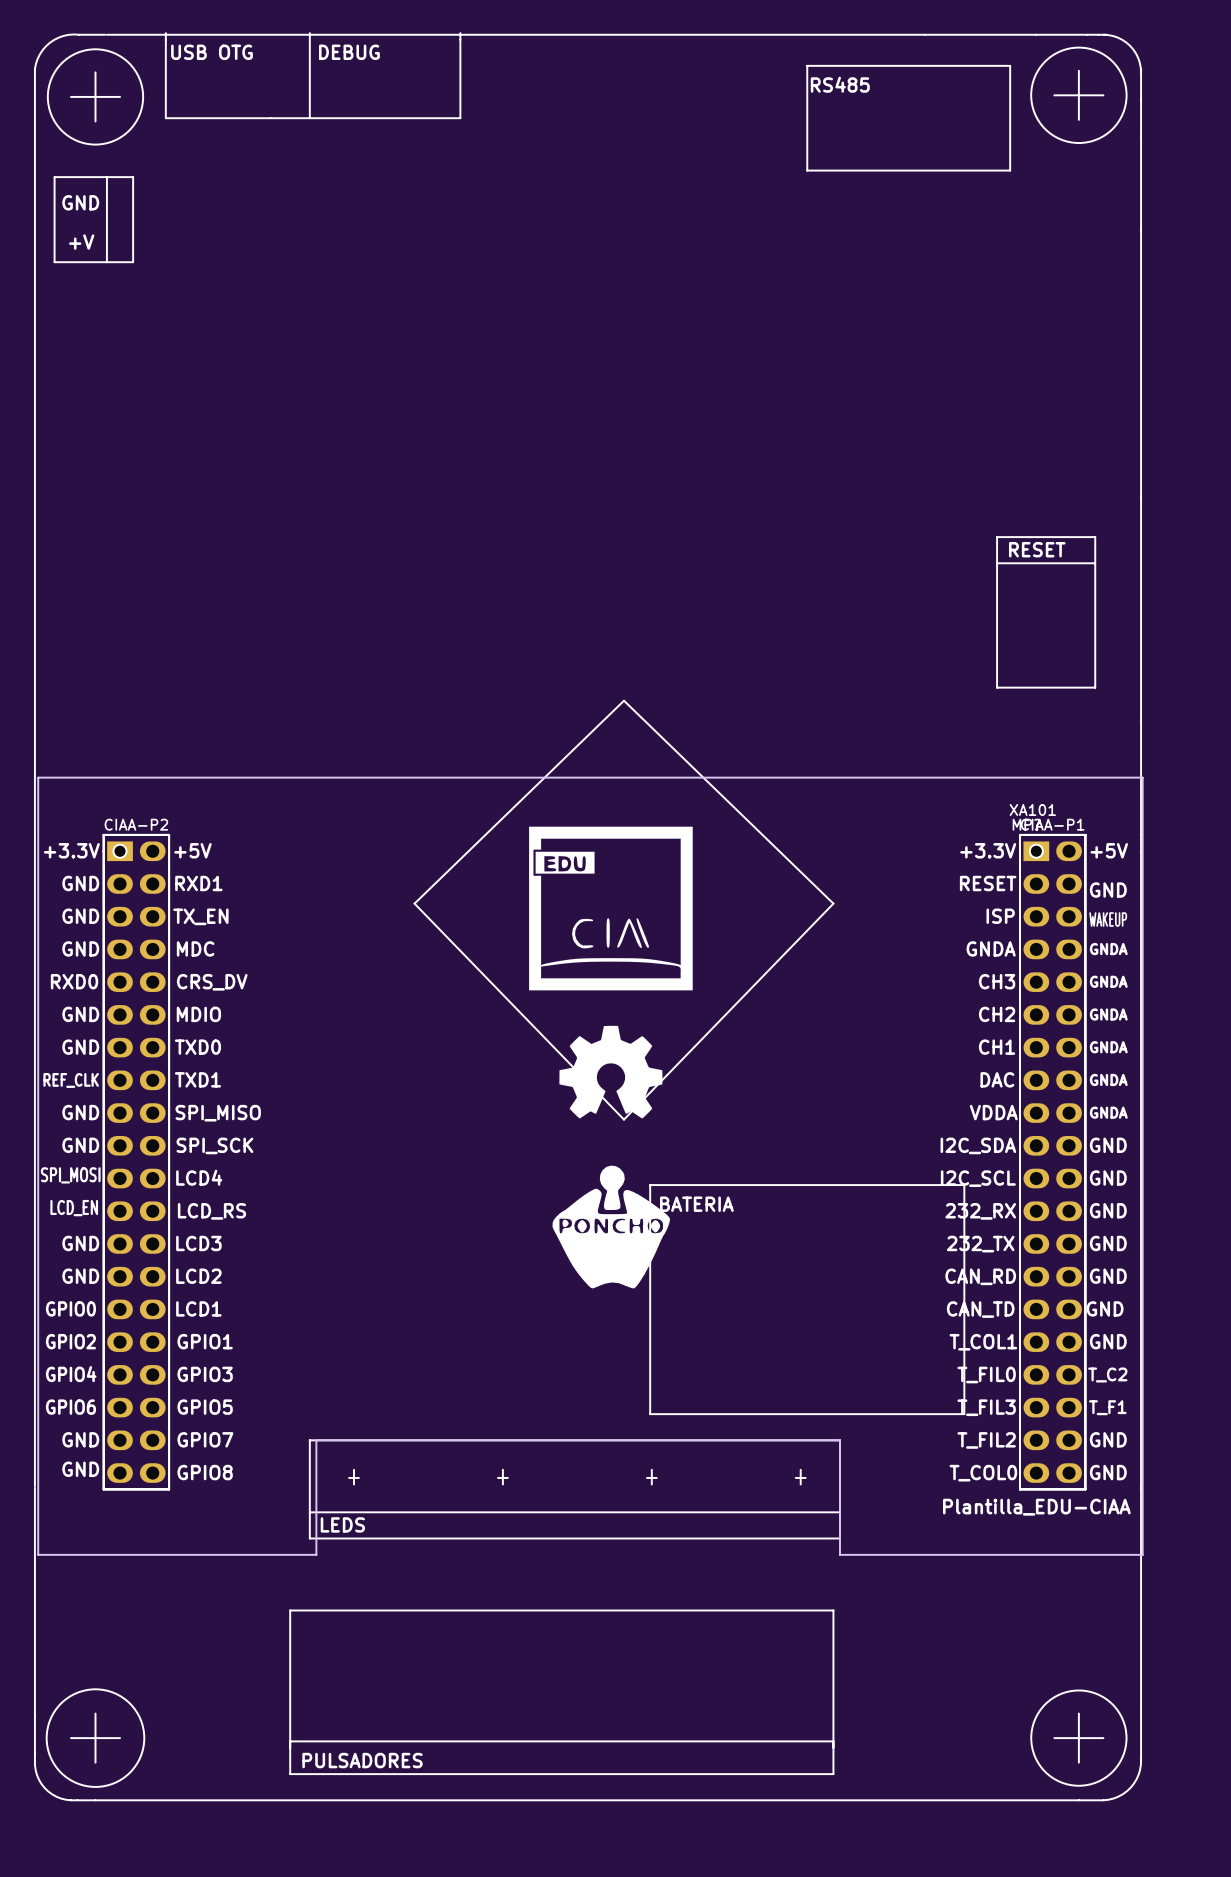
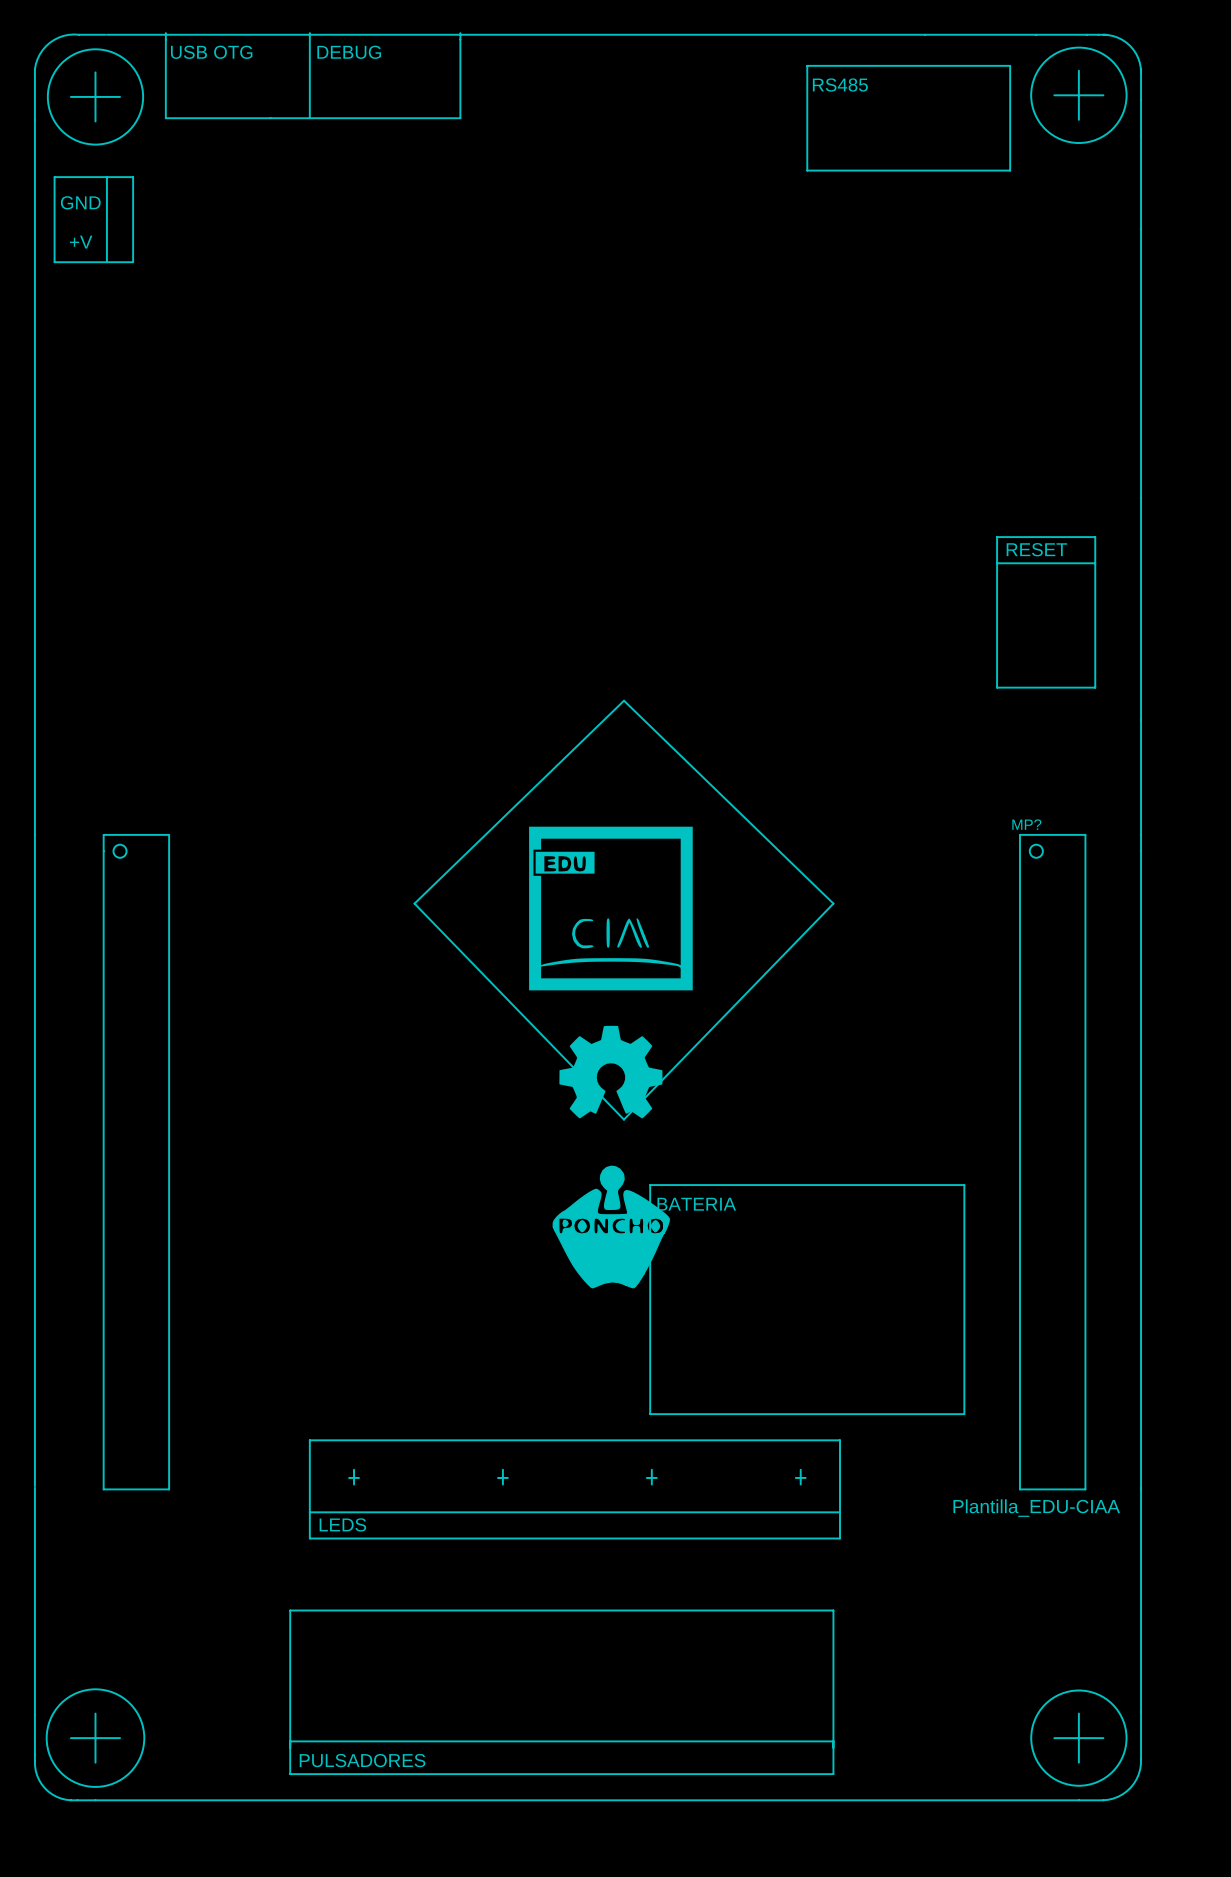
board edge: (38, 777) (38, 1554) (316, 1554) (316, 1440) (839, 1440) (839, 1554) (1142, 1554) (1142, 777) (38, 777) -> none
XA101: (594, 1162) -> none

